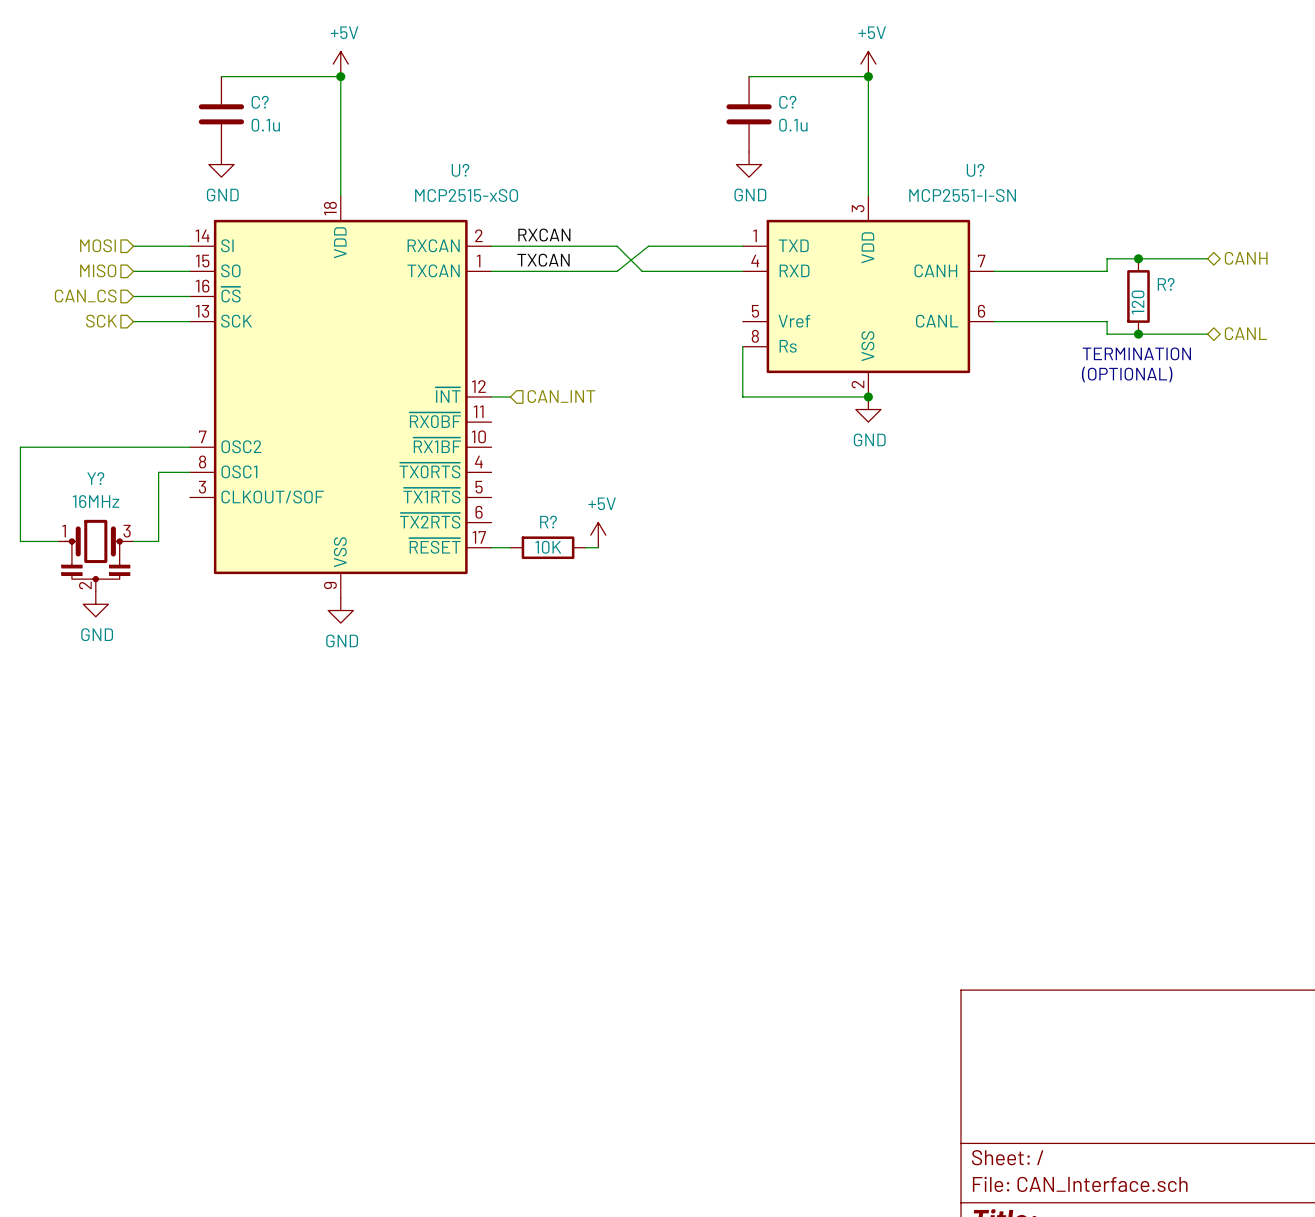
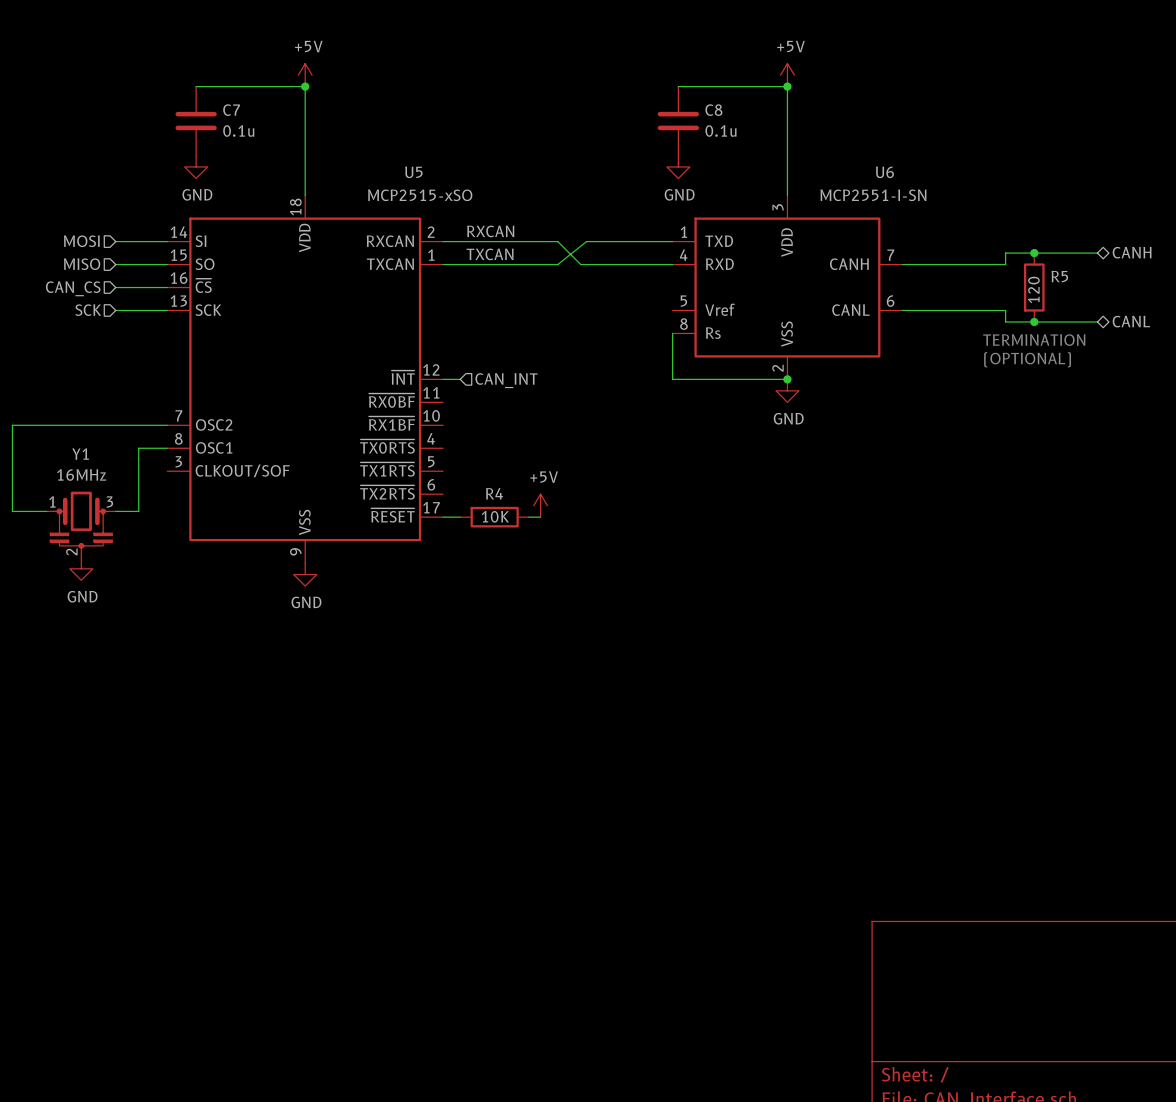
C? name: C? (260, 102) -> C7 (231, 110)
C? name: C? (787, 102) -> C8 (713, 110)
U? name: U? (460, 170) -> U5 (413, 172)
U? name: U? (975, 170) -> U6 (884, 172)
R? name: R? (1166, 284) -> R5 (1059, 276)
Y? name: Y? (95, 478) -> Y1 (80, 454)
R? name: R? (548, 522) -> R4 (494, 493)

